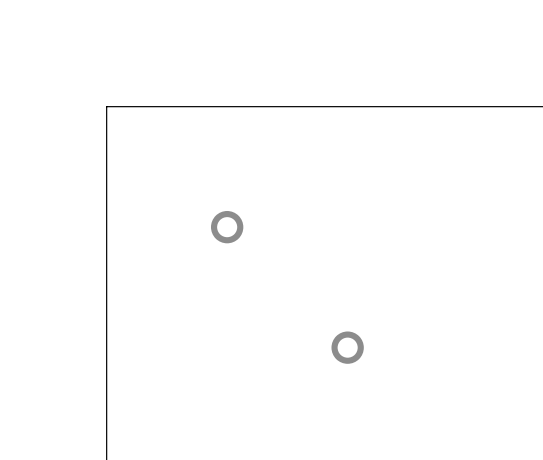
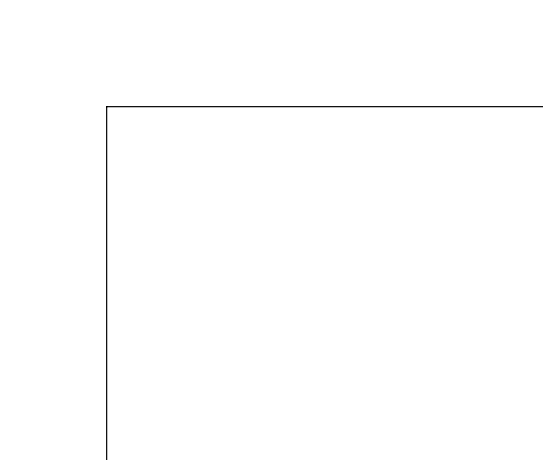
via: (227, 227) -> none
via: (347, 347) -> none

